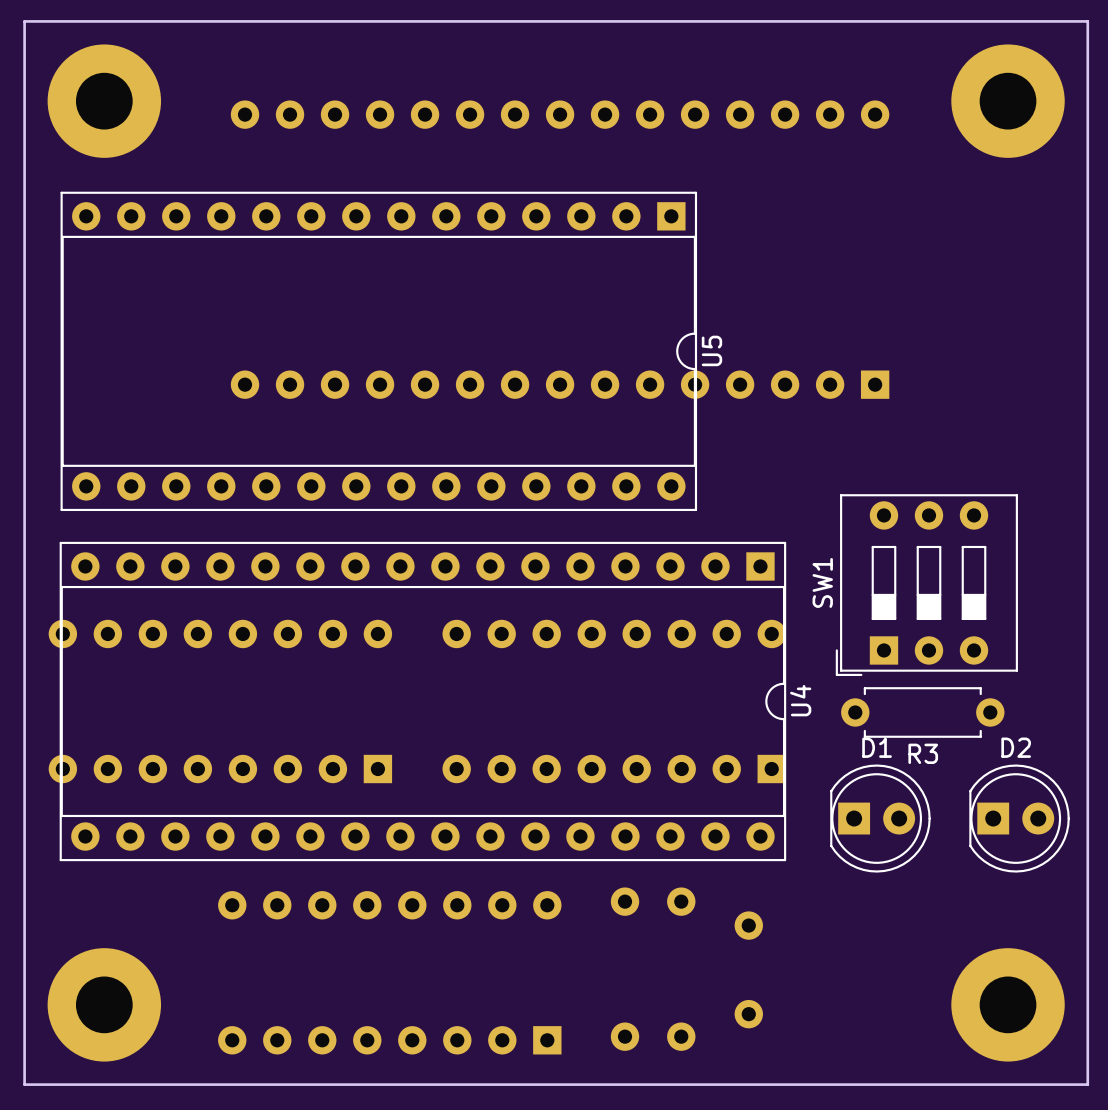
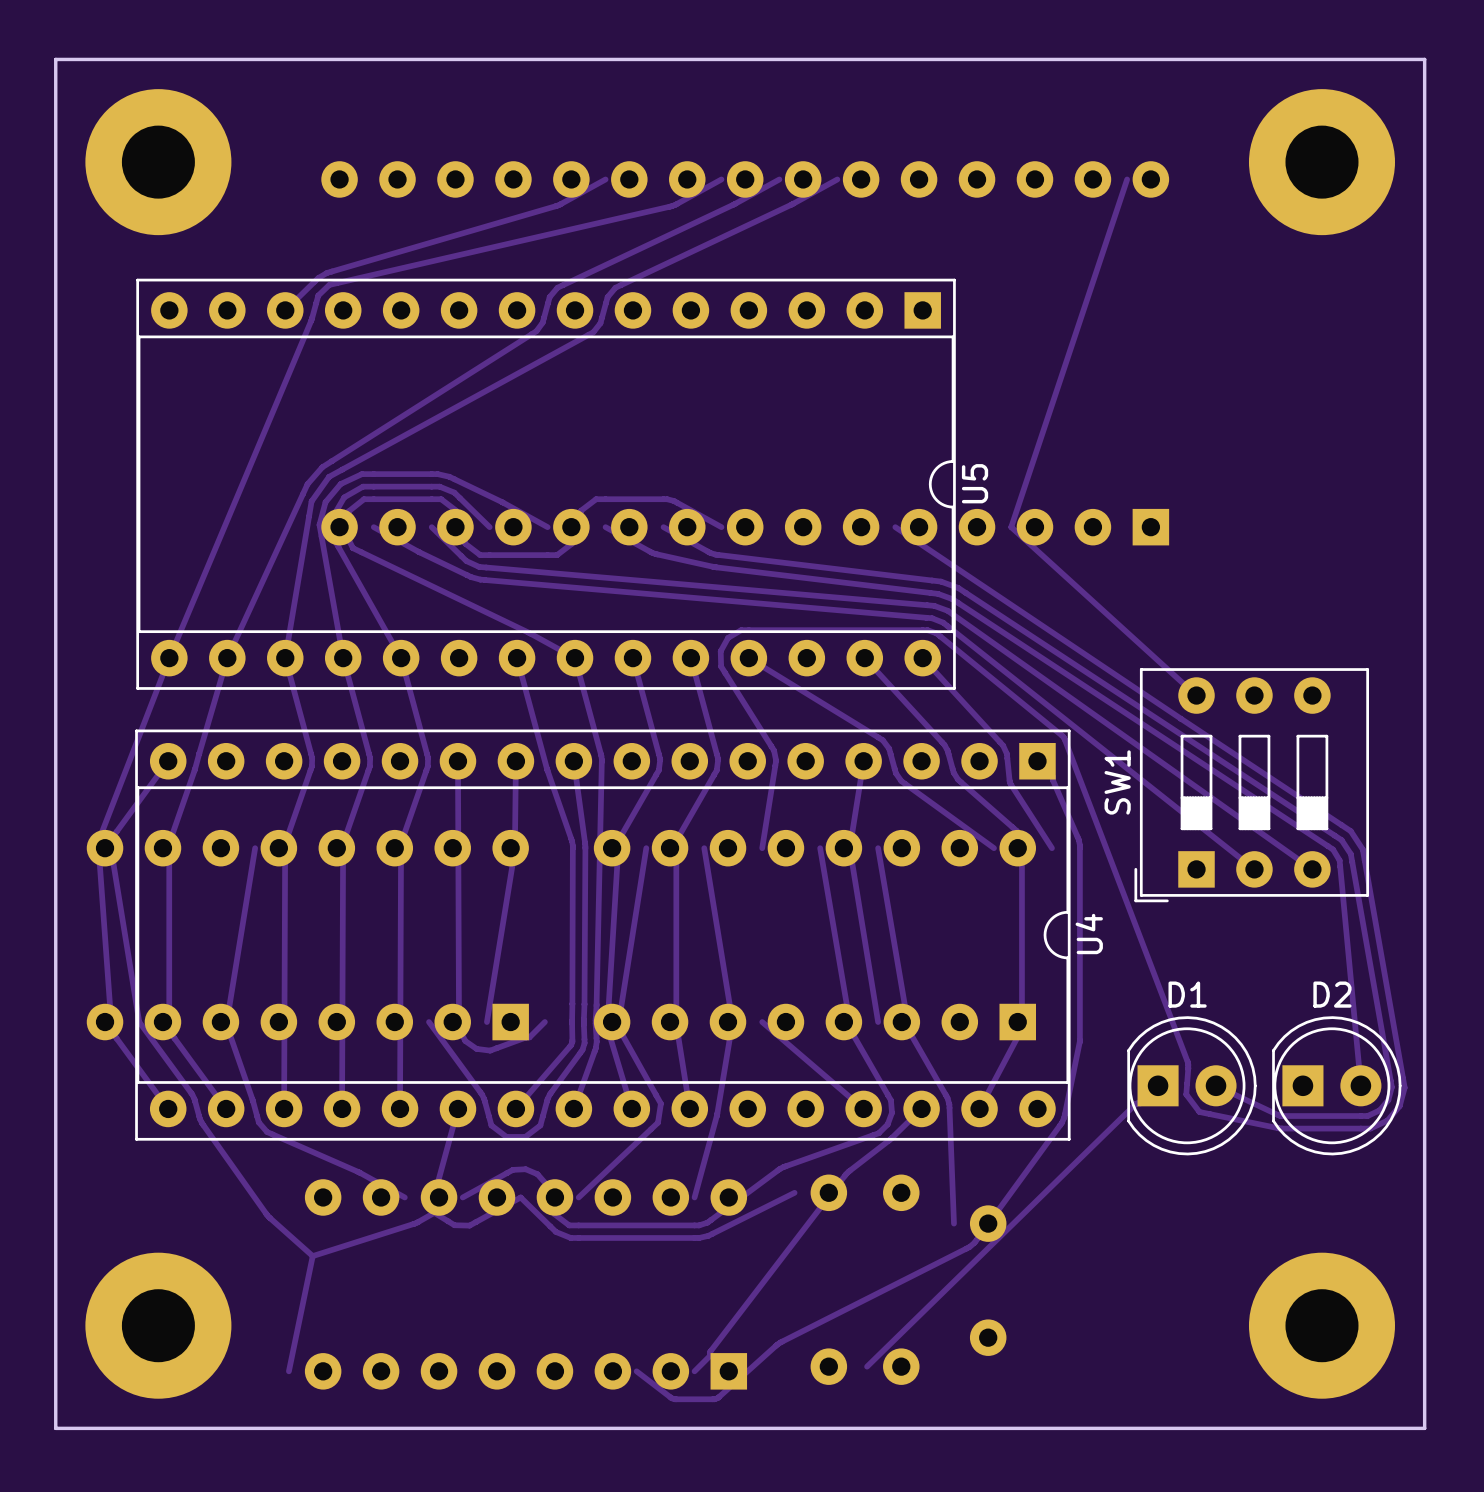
track: none -> (605, 179) (556, 205) (327, 272) (318, 277) (285, 310)
track: none -> (721, 179) (671, 206) (329, 284) (318, 295) (311, 320) (169, 658) (99, 837) (98, 846) (111, 1027) (114, 1035) (168, 1108)
track: none -> (779, 179) (733, 204) (557, 287) (549, 297) (542, 322) (536, 331) (322, 467) (307, 484) (227, 658) (195, 768) (169, 845) (169, 1026) (172, 1034) (226, 1108)
track: none -> (837, 179) (791, 204) (615, 287) (607, 297) (600, 323) (593, 332) (329, 476) (311, 501) (285, 658) (312, 758) (311, 766) (285, 845) (284, 1108)
track: none -> (1127, 179) (1011, 527) (1196, 695)
U5 position: (378, 351) -> (546, 484)
track: none -> (373, 527) (419, 552) (480, 579) (932, 618) (943, 622) (1254, 869)
track: none -> (431, 527) (466, 561) (479, 566) (934, 605) (947, 610) (1312, 869)
track: none -> (489, 527) (454, 492) (439, 486) (362, 486) (344, 497) (333, 516) (333, 537) (401, 658) (428, 758) (427, 766) (401, 845) (400, 1108)
track: none -> (547, 527) (501, 501) (449, 476) (437, 474) (362, 474) (340, 484) (325, 502) (319, 524) (343, 658) (370, 758) (369, 766) (343, 845) (342, 1108)
track: none -> (605, 527) (655, 554) (713, 566) (938, 593) (952, 599) (1333, 849) (1339, 860) (1360, 1085)
track: none -> (663, 527) (715, 554) (941, 581) (958, 587) (1341, 840) (1350, 854) (1391, 1087) (1388, 1100) (1379, 1110) (1367, 1116) (1281, 1116) (1216, 1085)
track: none -> (721, 527) (673, 500) (667, 499) (596, 499) (581, 510) (572, 543) (557, 555) (480, 555) (465, 543) (456, 510) (441, 499) (364, 499) (348, 511) (344, 530) (352, 548) (529, 632) (575, 658) (601, 759) (595, 1020) (596, 1041) (573, 1108)
track: none -> (895, 527) (1350, 831) (1362, 849) (1404, 1087) (1399, 1106) (1387, 1120) (1370, 1128) (1279, 1128) (1199, 1111) (1186, 1094) (1188, 1068)
track: none -> (517, 658) (547, 769) (572, 845) (572, 1003)
track: none -> (632, 658) (660, 759) (658, 770) (618, 843) (607, 1022) (631, 1108)
track: none -> (690, 658) (718, 759) (716, 770) (678, 837) (676, 844) (676, 1023) (689, 1108)
track: none -> (748, 658) (882, 740) (889, 748) (895, 773) (901, 781) (994, 848)
track: none -> (864, 658) (944, 744) (953, 772) (958, 779) (1016, 831) (1021, 842) (1021, 1025) (1020, 1032) (979, 1108)
track: none -> (922, 658) (1003, 745) (1006, 753) (1010, 783) (1051, 848)
track: none -> (168, 761) (113, 836) (110, 847) (139, 1022) (192, 1094) (201, 1123) (267, 1214) (312, 1256)
track: none -> (457, 761) (459, 1028) (465, 1041) (476, 1048) (490, 1050) (525, 1037)
track: none -> (515, 761) (514, 851) (486, 1022)
track: none -> (573, 761) (585, 846) (584, 1043) (582, 1049) (549, 1094) (540, 1125) (525, 1136) (506, 1136) (491, 1125) (482, 1094) (429, 1022)
track: none -> (863, 761) (850, 850) (878, 1022)
track: none -> (1053, 780) (1079, 845) (1079, 1040) (1061, 1122) (969, 1247) (780, 1342) (717, 1397) (674, 1399) (636, 1371)
SW1 position: (926, 585) -> (1251, 785)
track: none -> (255, 848) (226, 1020) (227, 1027) (258, 1122) (267, 1132) (358, 1172) (404, 1197)
track: none -> (646, 848) (618, 1022) (620, 1031) (660, 1103) (657, 1122) (578, 1197)
track: none -> (704, 848) (732, 1024) (717, 1114) (694, 1197)
track: none -> (762, 848) (776, 760) (774, 750) (721, 666) (720, 651) (728, 637) (741, 630) (927, 630) (936, 633) (1064, 738) (1187, 1062) (1188, 1068)
track: none -> (820, 848) (850, 1029) (890, 1100) (892, 1112) (887, 1124) (878, 1133) (783, 1167) (707, 1222) (699, 1225) (569, 1225) (554, 1213) (545, 1183) (537, 1174) (525, 1169) (512, 1169) (462, 1197)
track: none -> (878, 848) (908, 1029) (949, 1104) (953, 1223)
U4 position: (422, 701) -> (602, 935)
R3: (922, 712) -> none
track: none -> (572, 1003) (571, 1045) (515, 1108)
track: none -> (544, 1022) (529, 1037) (525, 1037)
track: none -> (762, 1022) (863, 1108)
track: none -> (1158, 1085) (1140, 1103) (1135, 1103) (867, 1366)
D1 position: (880, 818) -> (1191, 1085)
track: none -> (457, 1108) (435, 1191) (434, 1212)
track: none -> (921, 1108) (889, 1140) (845, 1174) (710, 1351) (709, 1355) (694, 1371)
track: none -> (794, 1192) (708, 1235) (699, 1237) (570, 1237) (556, 1231) (520, 1197) (469, 1225) (454, 1225) (434, 1212)
track: none -> (434, 1212) (414, 1223) (312, 1256)
track: none -> (312, 1256) (288, 1371)

